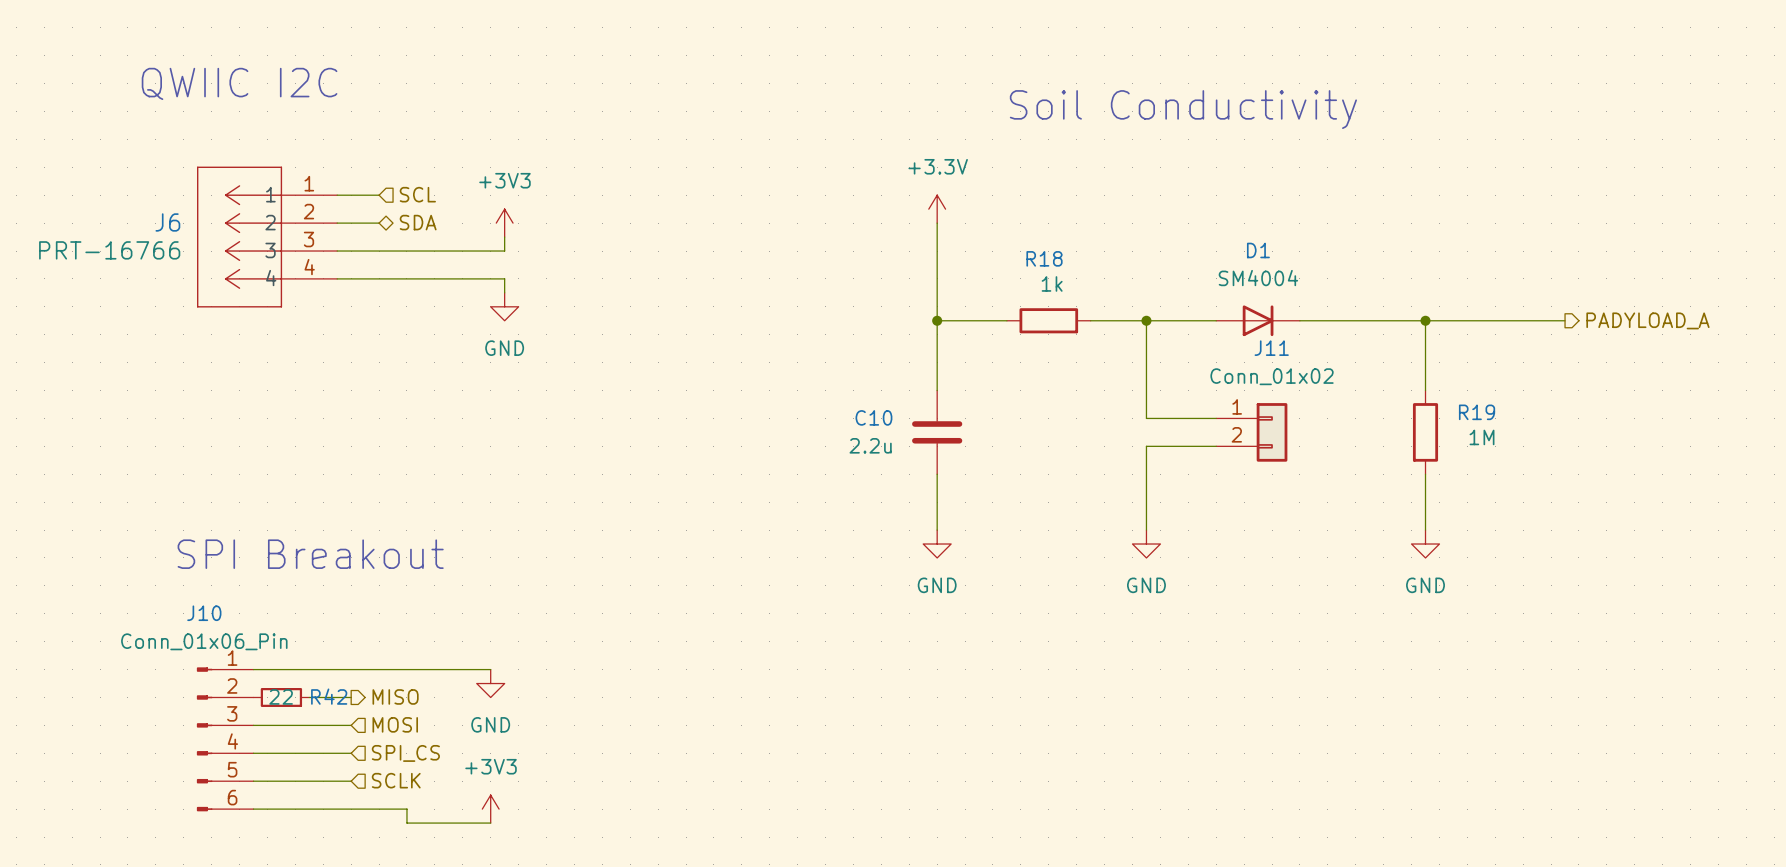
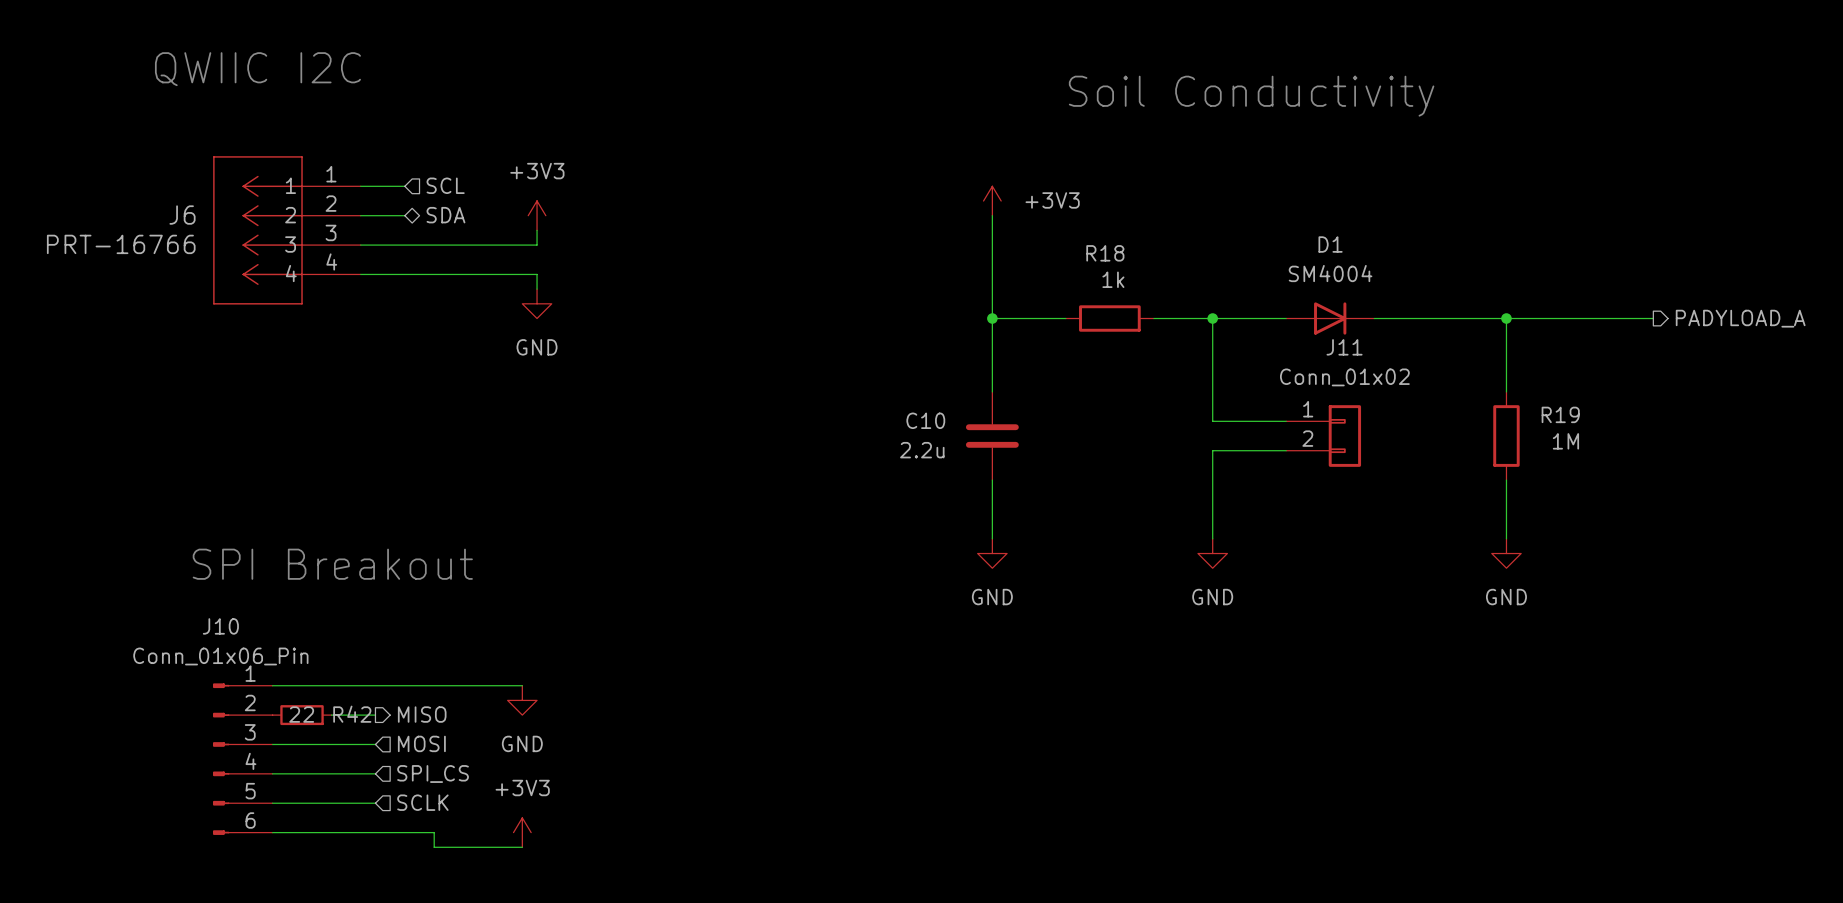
power symbol: +3.3V (937, 209) -> +3V3 (992, 201)

